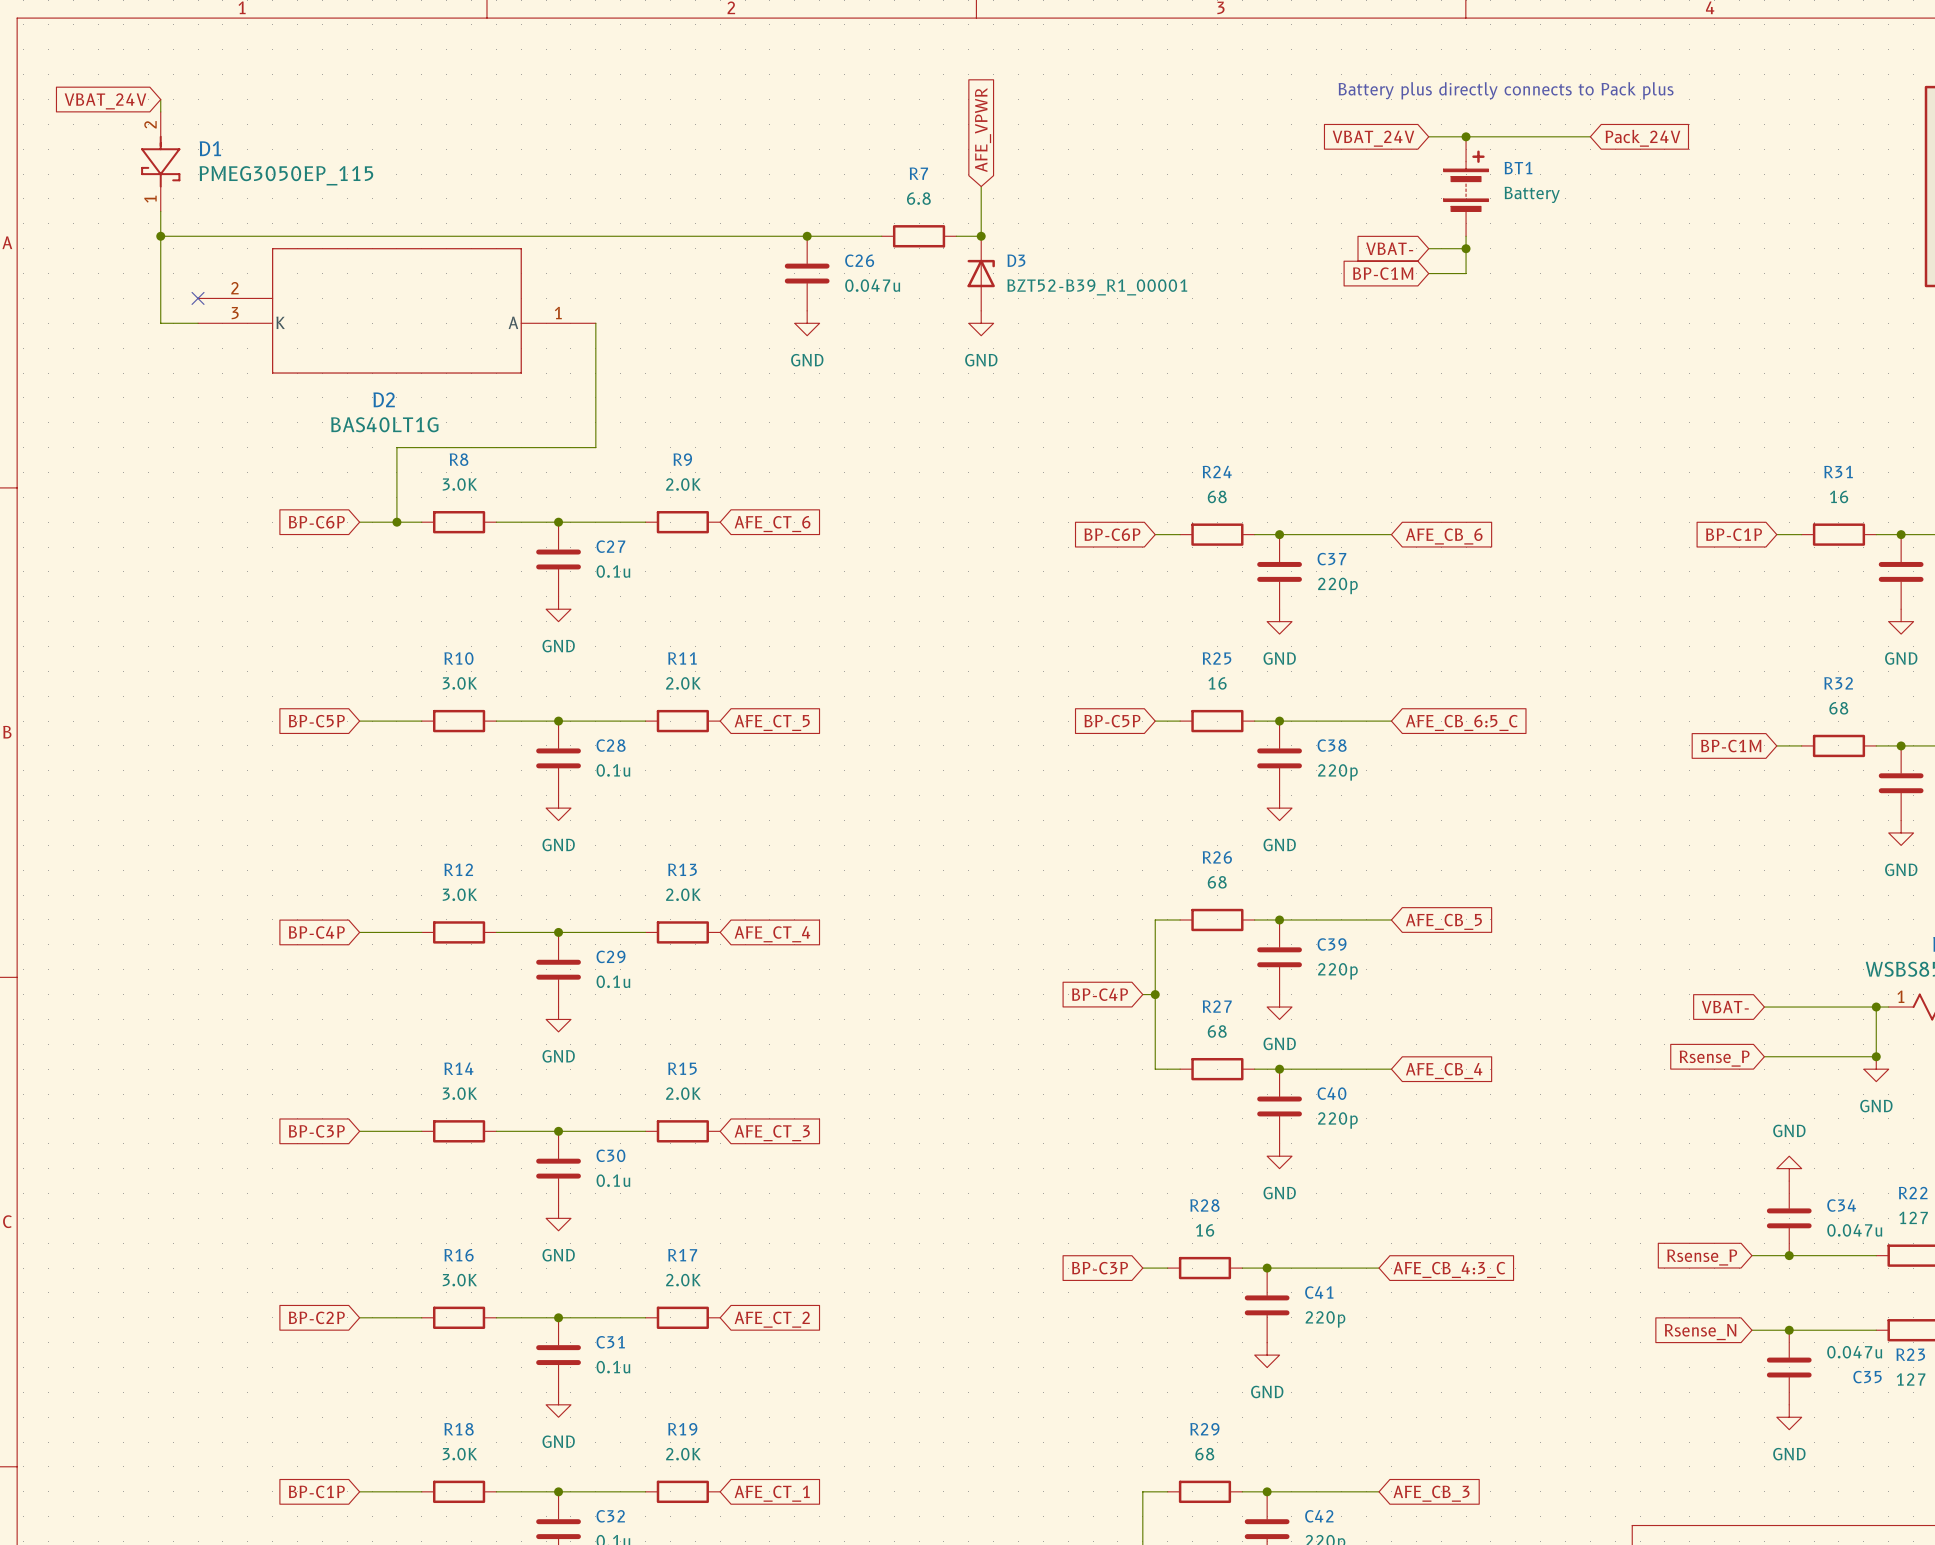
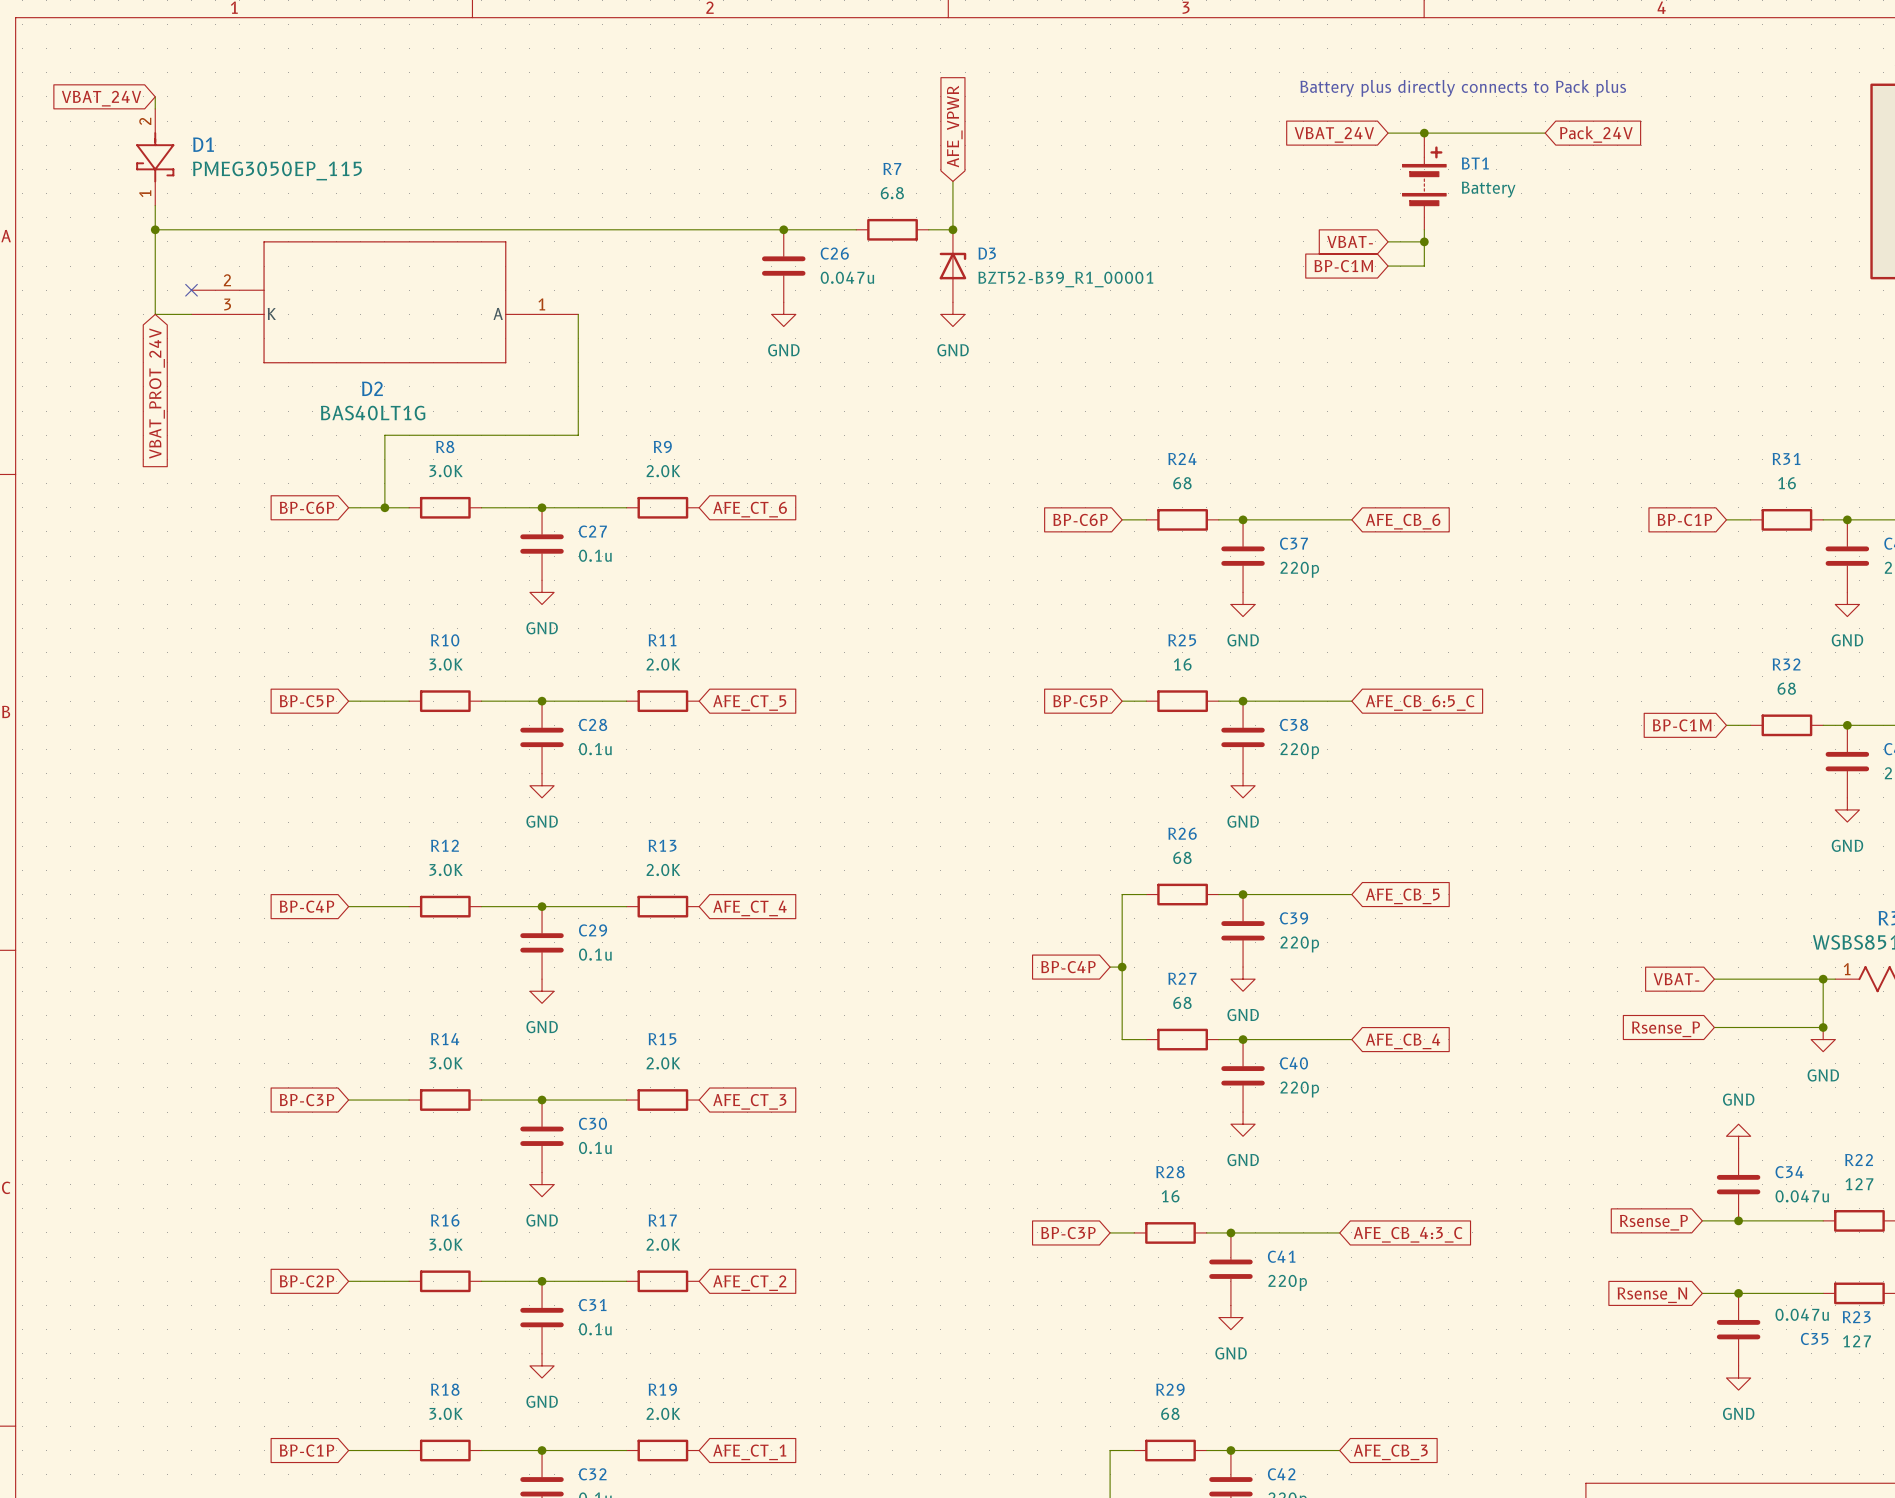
global label: none -> VBAT_PROT_24V (157, 393)

